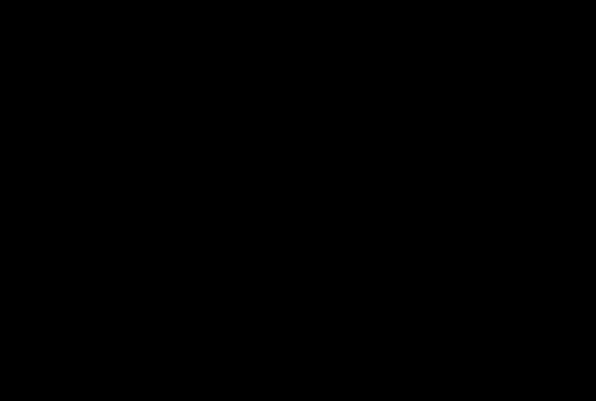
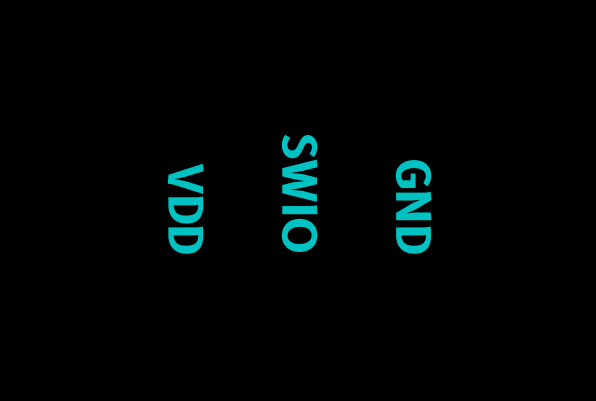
text: none -> SWIO (299, 193)
text: none -> GND (413, 206)
text: none -> VDD (185, 208)

